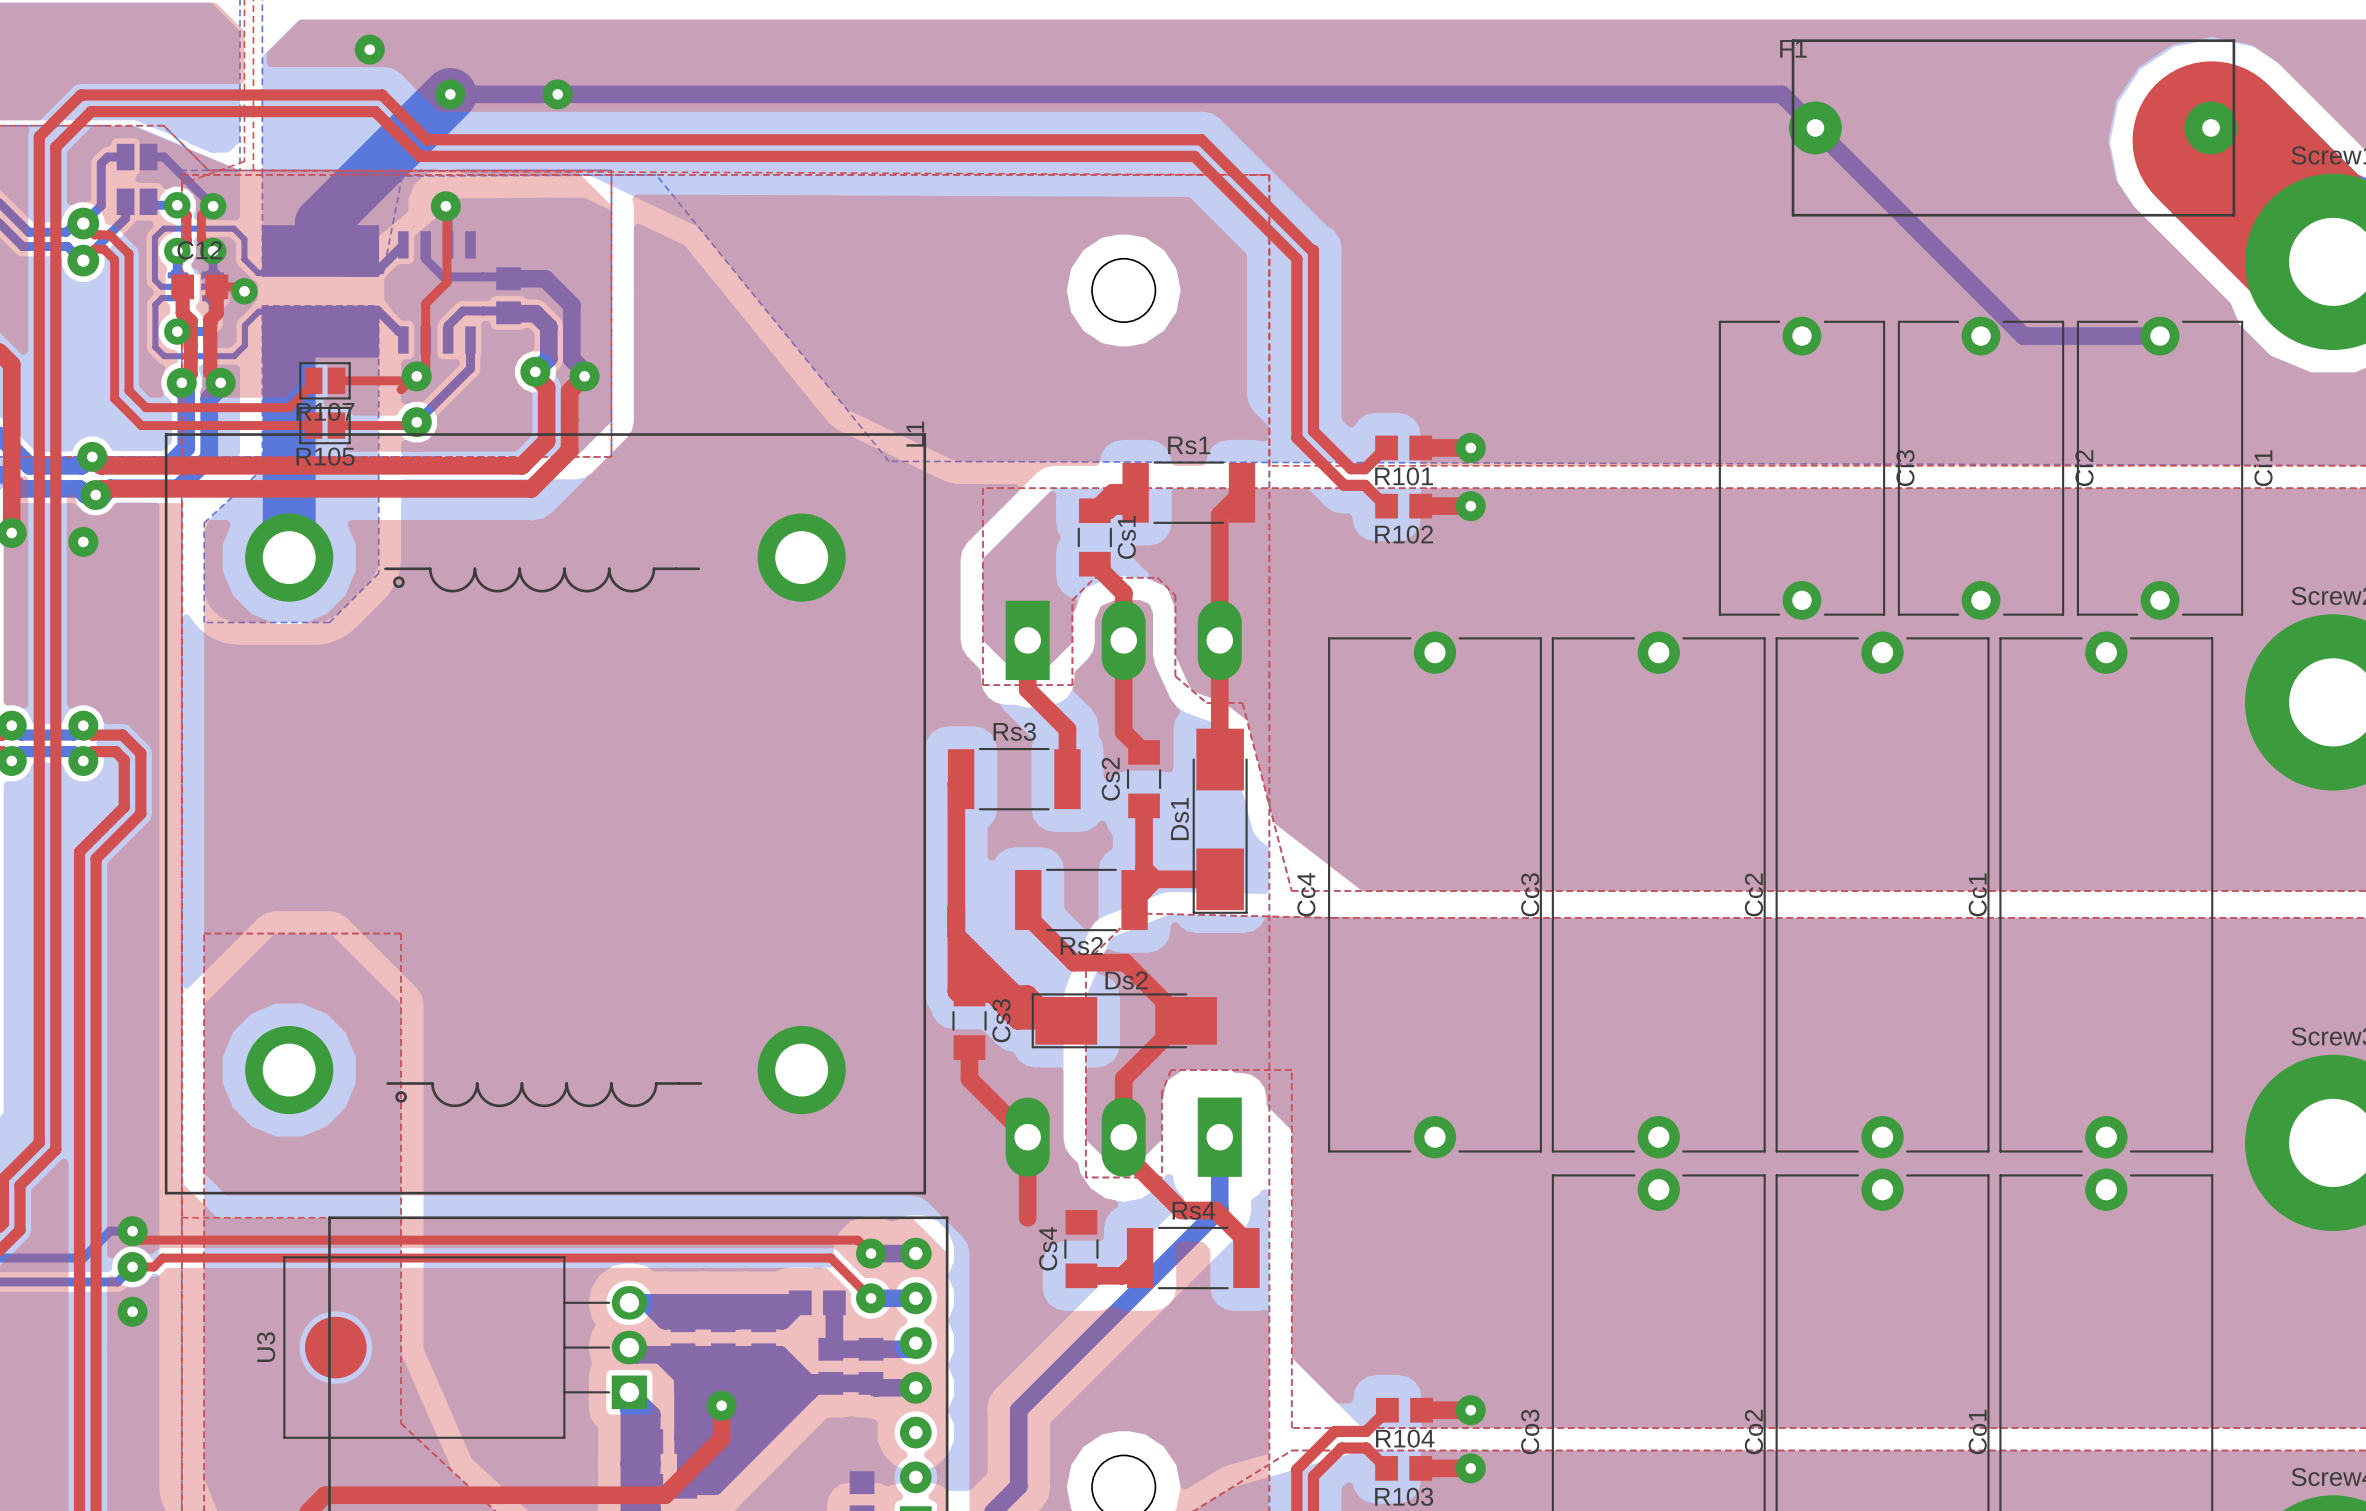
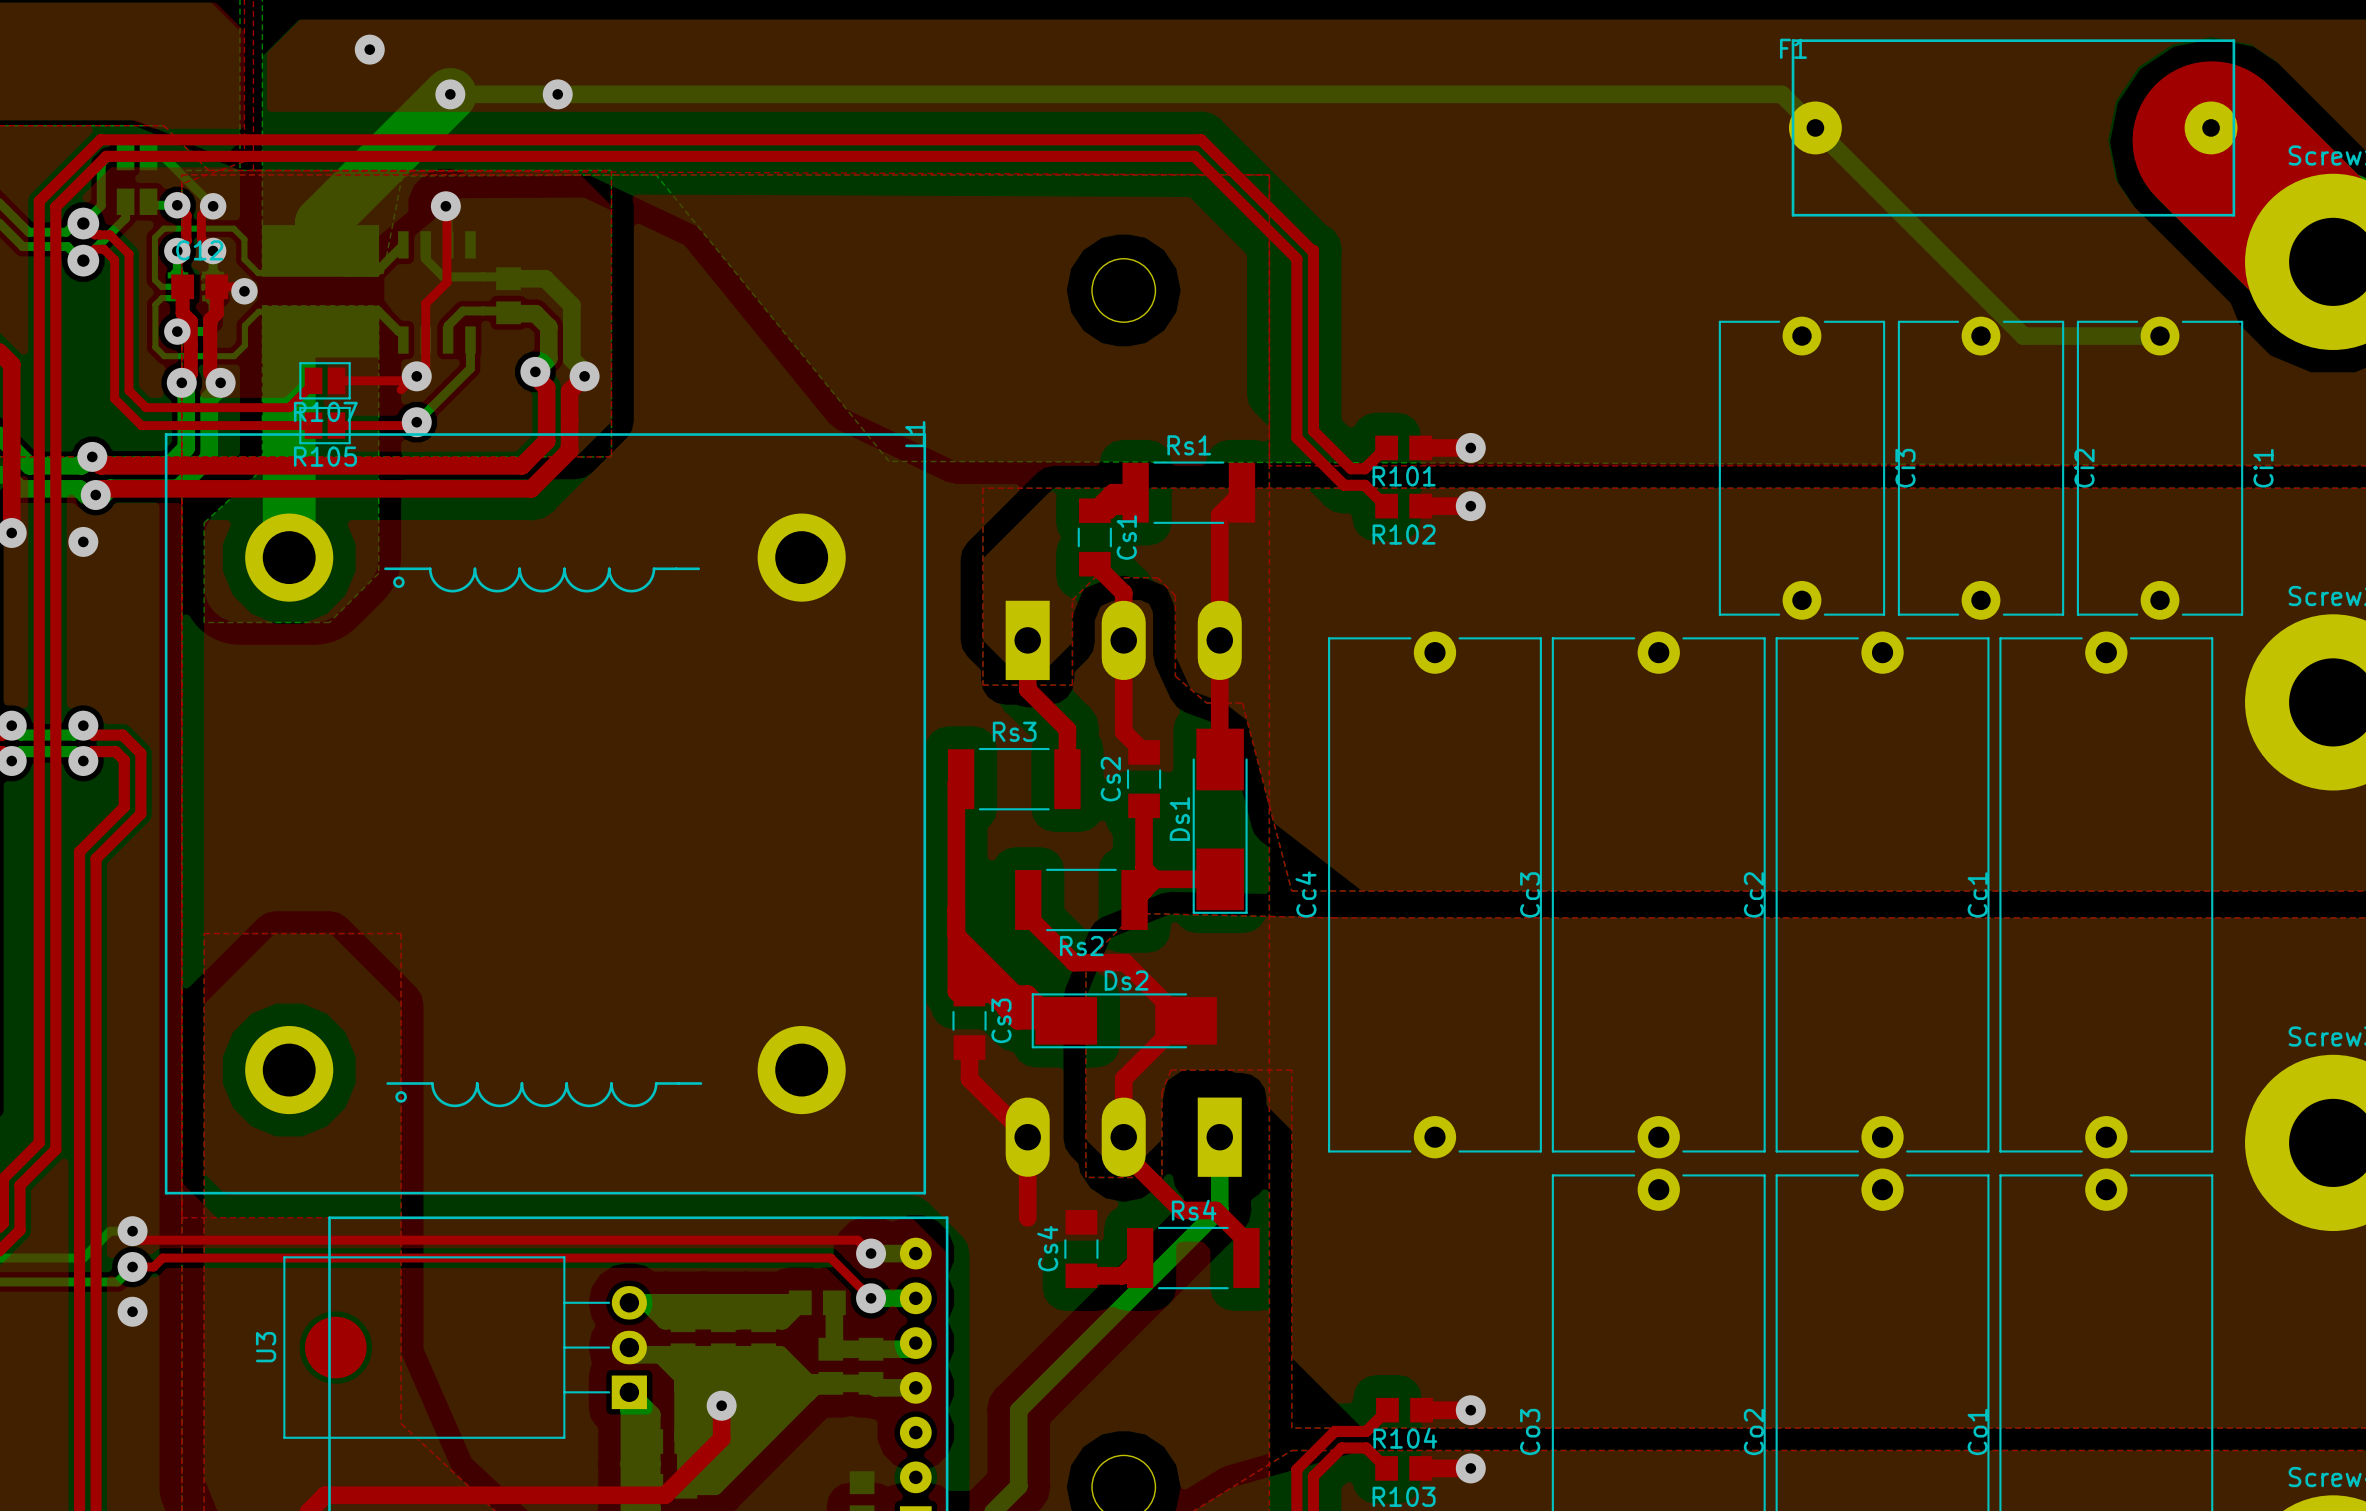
top track: (426, 139) (382, 95) (80, 95) (39, 136) (39, 201) -> (426, 139) (100, 139) (39, 201)
top track: (420, 156) (375, 111) (91, 111) (55, 147) (55, 206) -> (420, 156) (106, 156) (55, 206)

